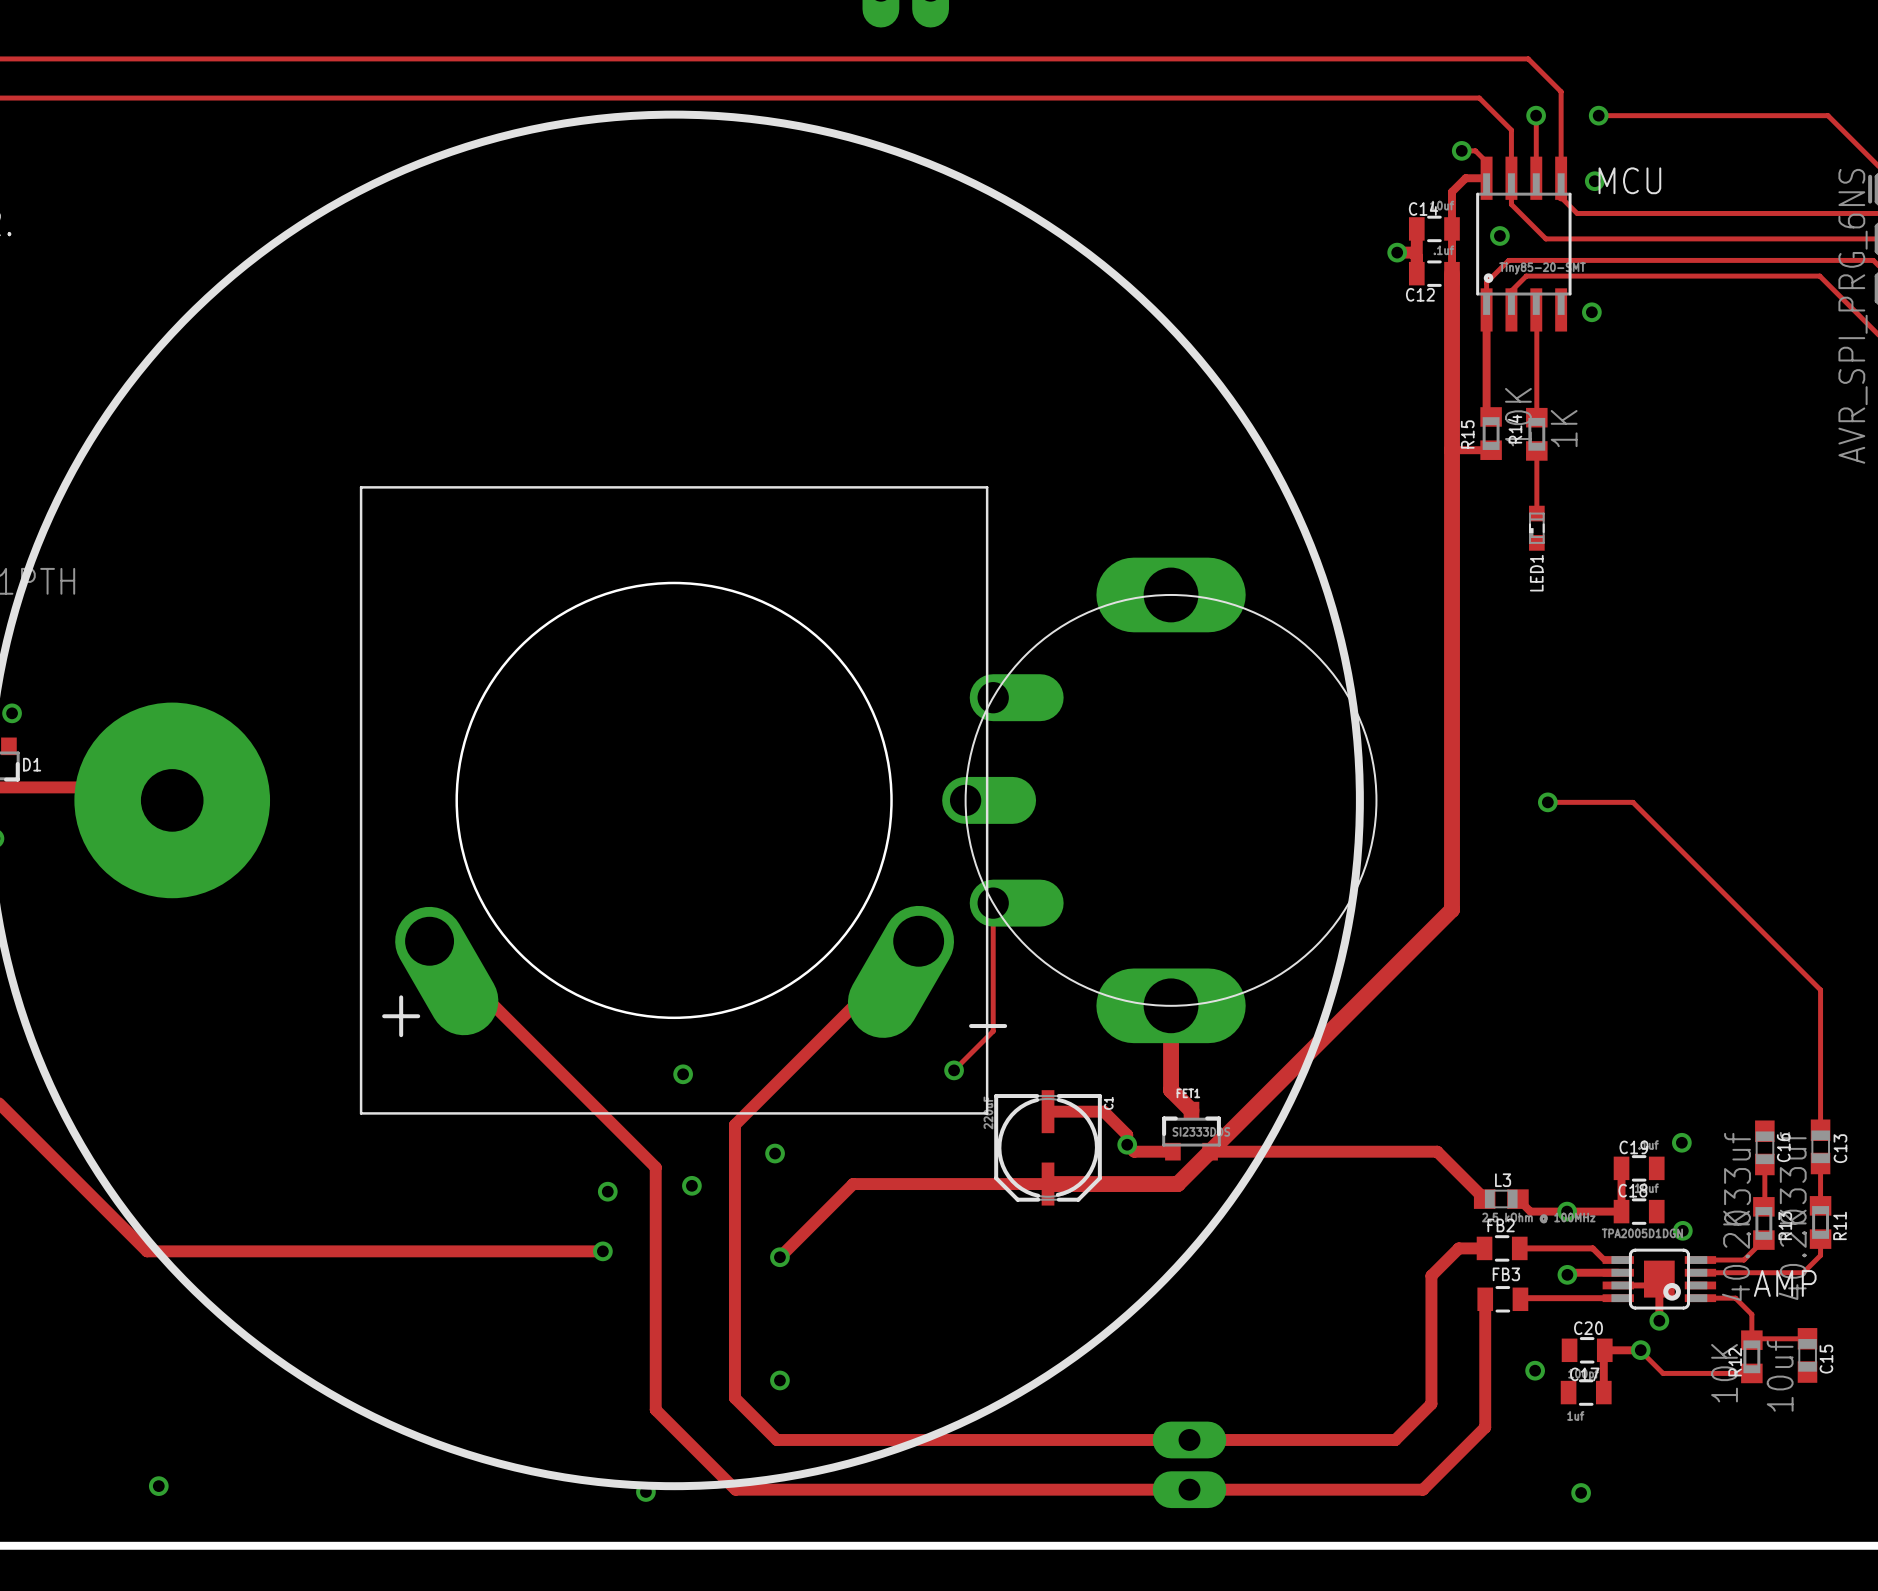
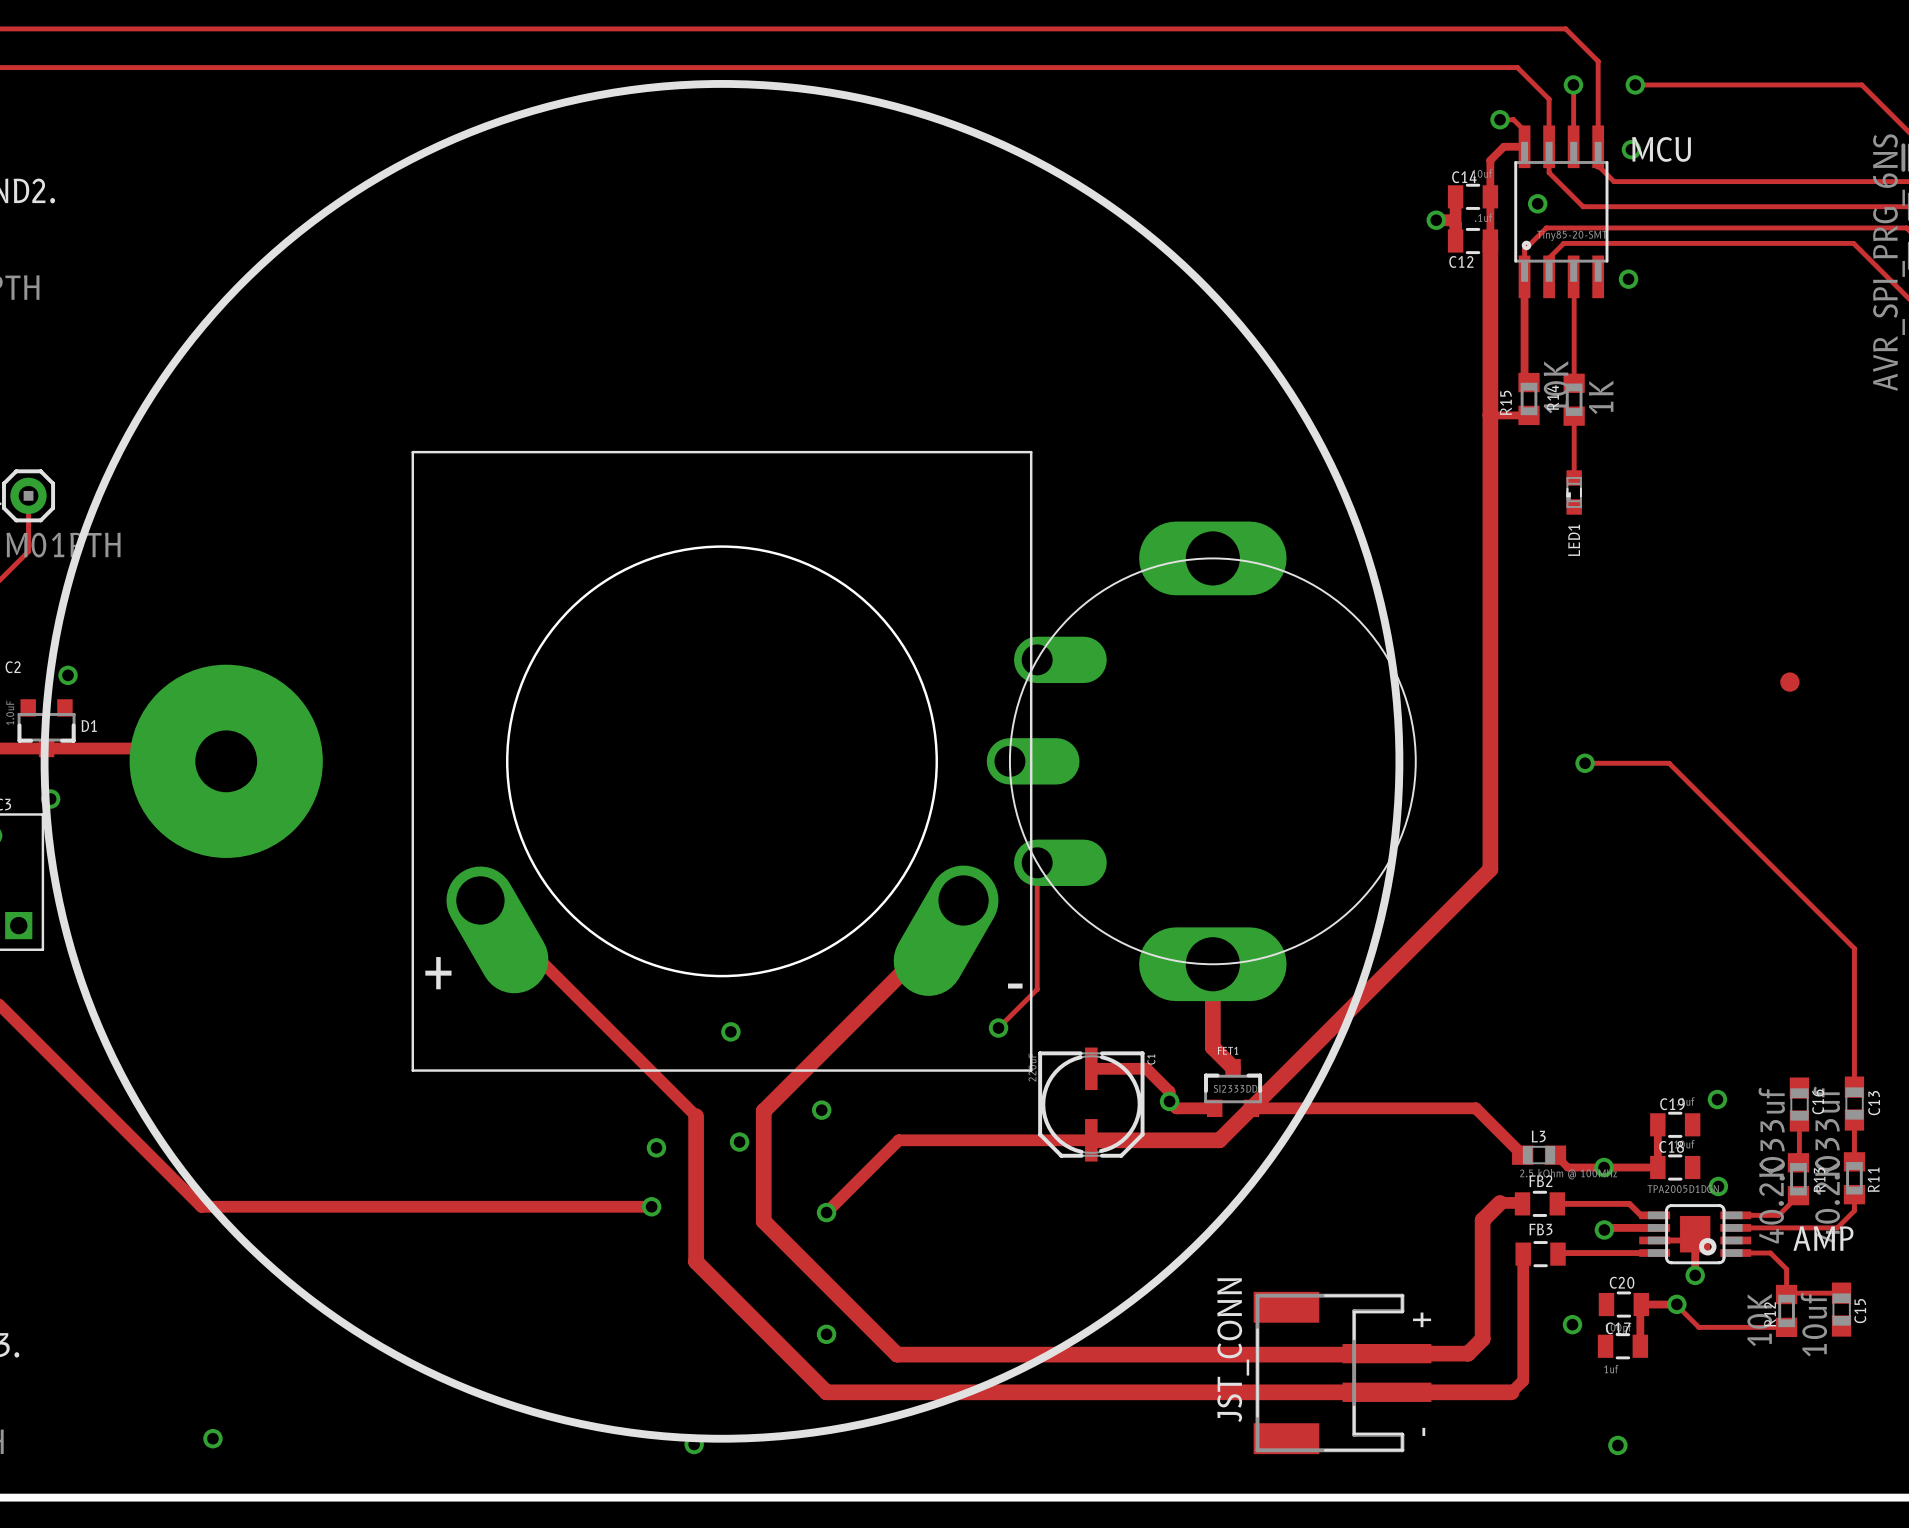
part: none -> (1789, 682)
track: (918, 941) (734, 1124) (734, 1398) (776, 1439) (1395, 1439) (1431, 1403) (1431, 1275) (1458, 1248) (1484, 1248) -> (963, 900) (963, 911) (763, 1111) (763, 1221) (897, 1354) (1397, 1353)
track: (647, 1159) (655, 1167) (655, 1409) (735, 1489) (1422, 1489) (1473, 1439) -> (696, 1116) (696, 1261) (826, 1392) (1511, 1392)
track: none -> (1522, 1203) (1500, 1202) (1482, 1220) (1482, 1339) (1468, 1353) (1397, 1353)
JST_CONN: none -> (1342, 1372)
part: (1189, 1464) -> none

